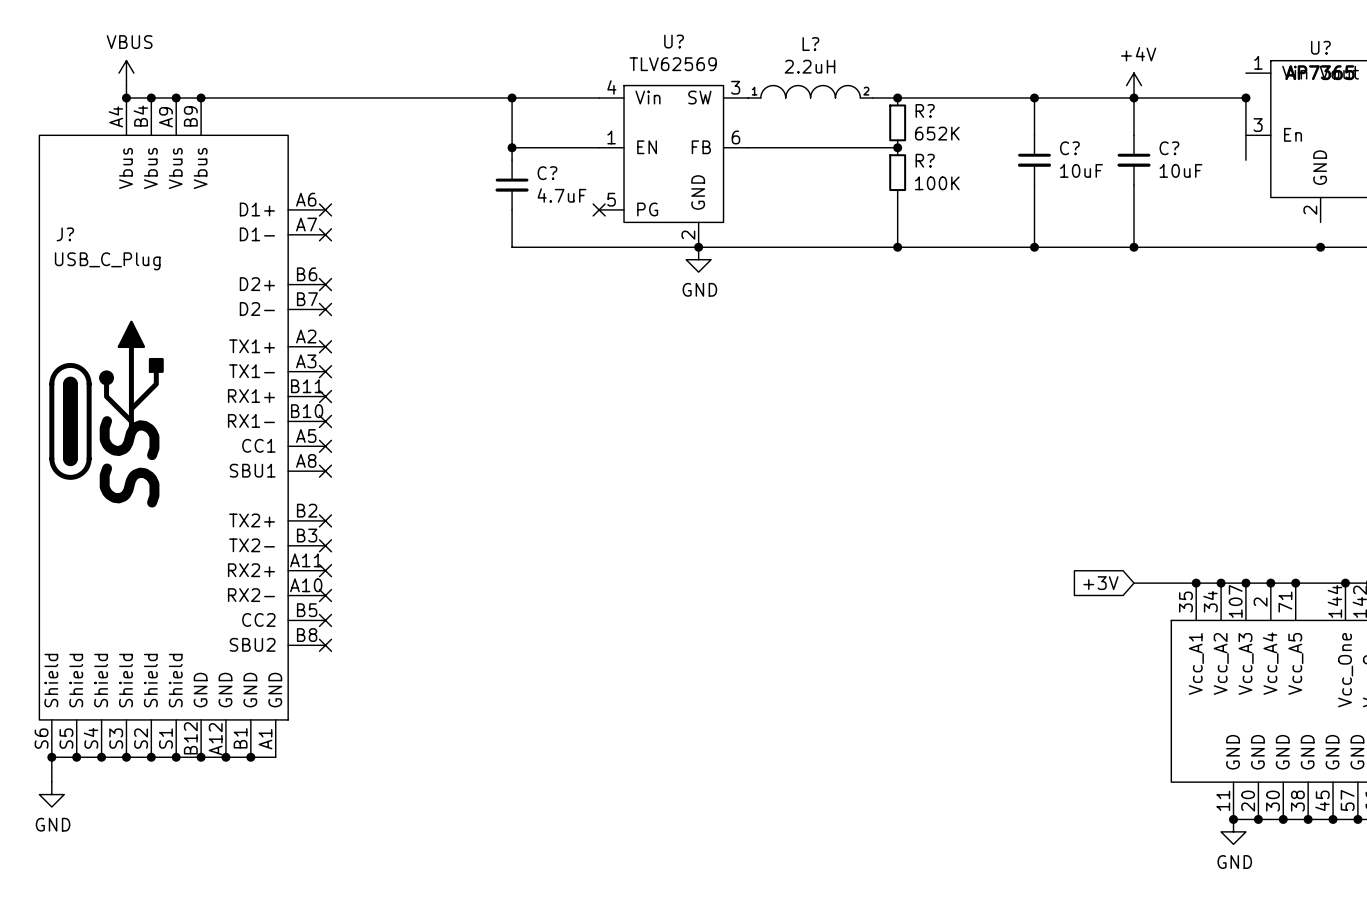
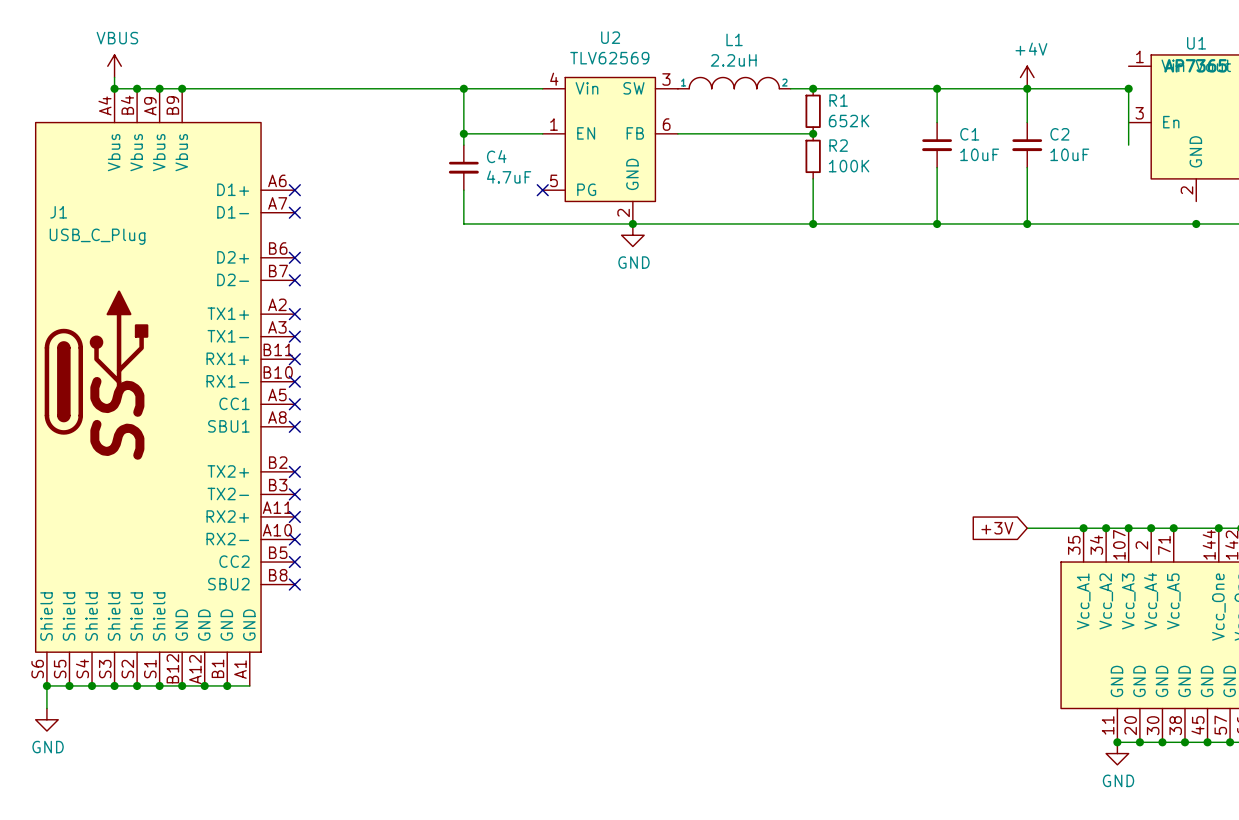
U? name: U? (674, 41) -> U2 (610, 37)
L? name: L? (810, 44) -> L1 (734, 39)
U? name: U? (1320, 47) -> U1 (1196, 43)
R? name: R? (925, 110) -> R1 (838, 100)
C? name: C? (1069, 148) -> C1 (969, 134)
C? name: C? (1169, 148) -> C2 (1059, 134)
R? name: R? (925, 160) -> R2 (838, 145)
C? name: C? (547, 173) -> C4 (496, 156)
J? name: J? (65, 234) -> J1 (58, 212)

